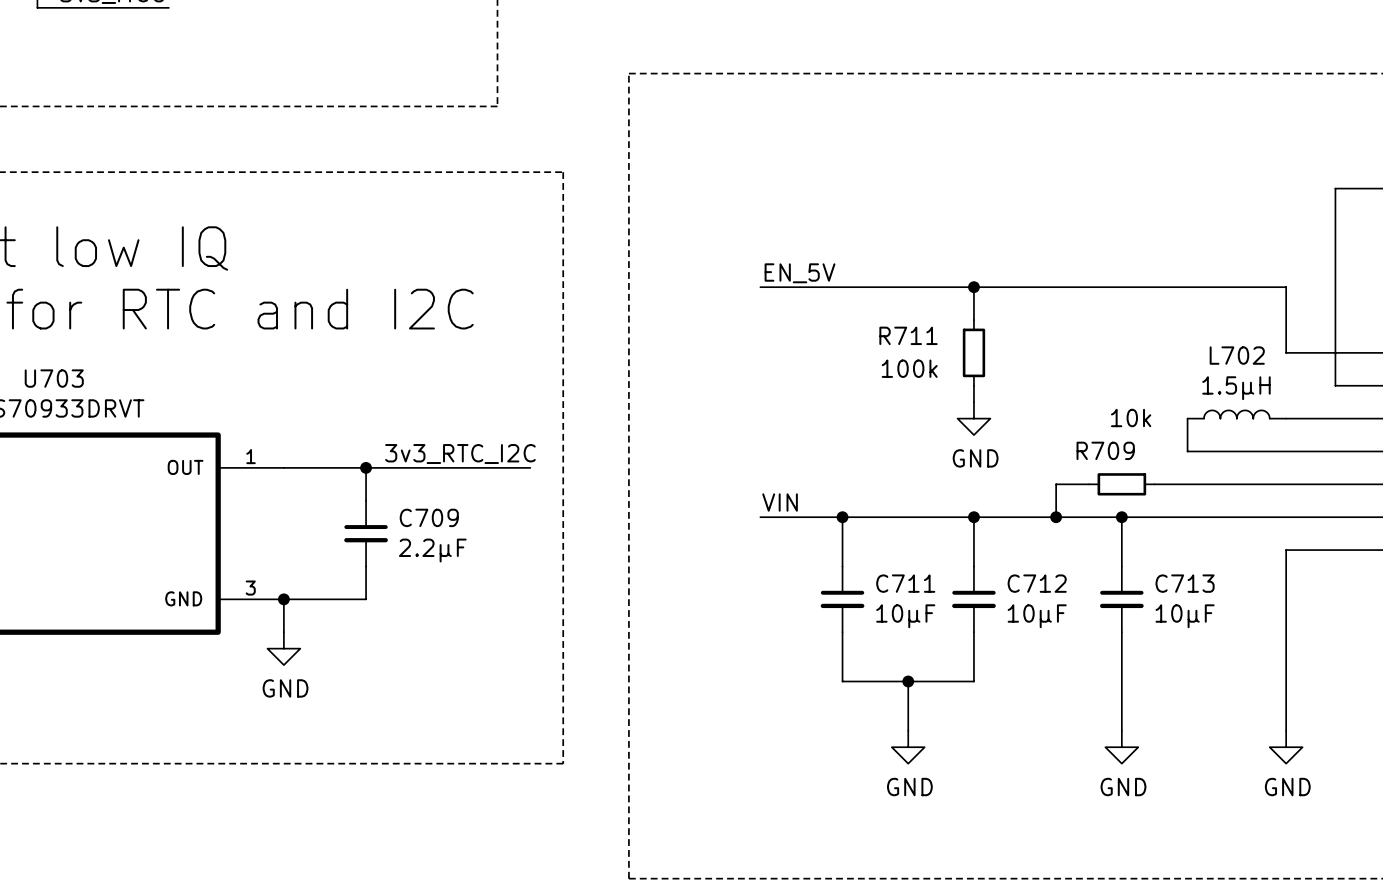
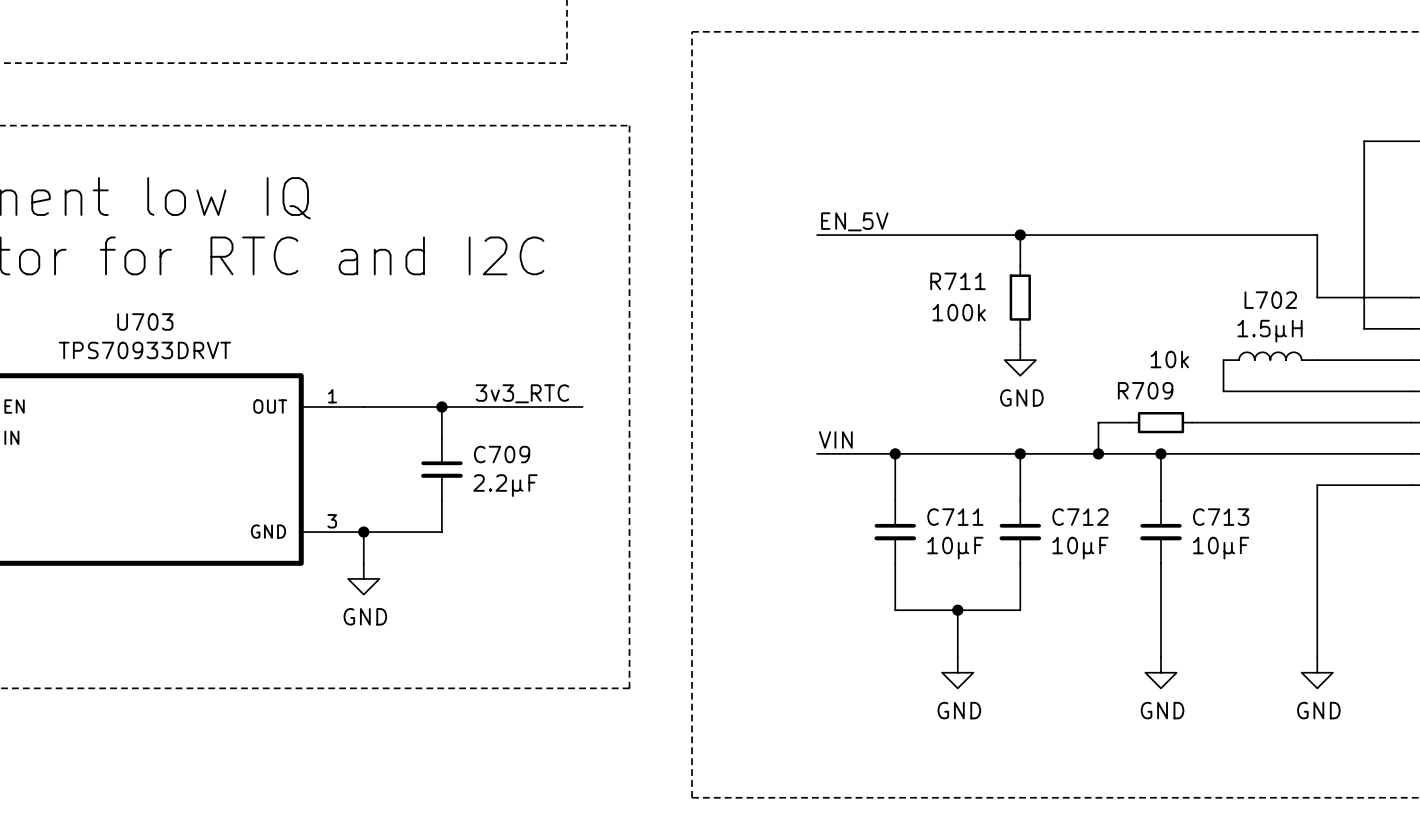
label: 3v3_RTC_I2C (460, 454) -> 3v3_RTC (522, 393)
wire: (513, 467) (530, 467) -> none

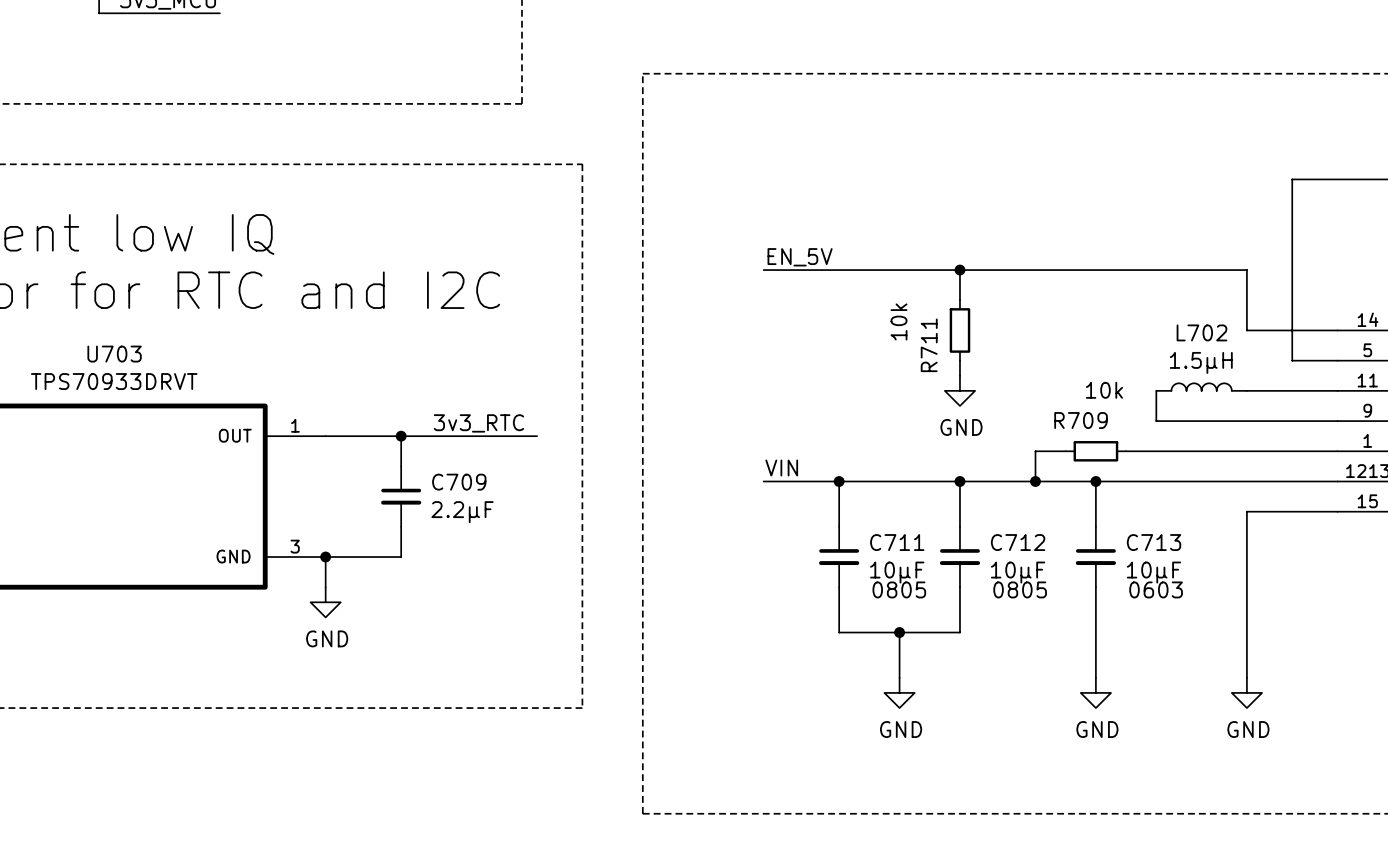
R711 name rotation: 0° (958, 281) -> 90° counterclockwise (929, 345)
R711 value: 100k (959, 312) -> 10k (899, 321)
text: none -> 0805 (899, 589)
text: none -> 0805 (1020, 589)
text: none -> 0603 (1156, 589)

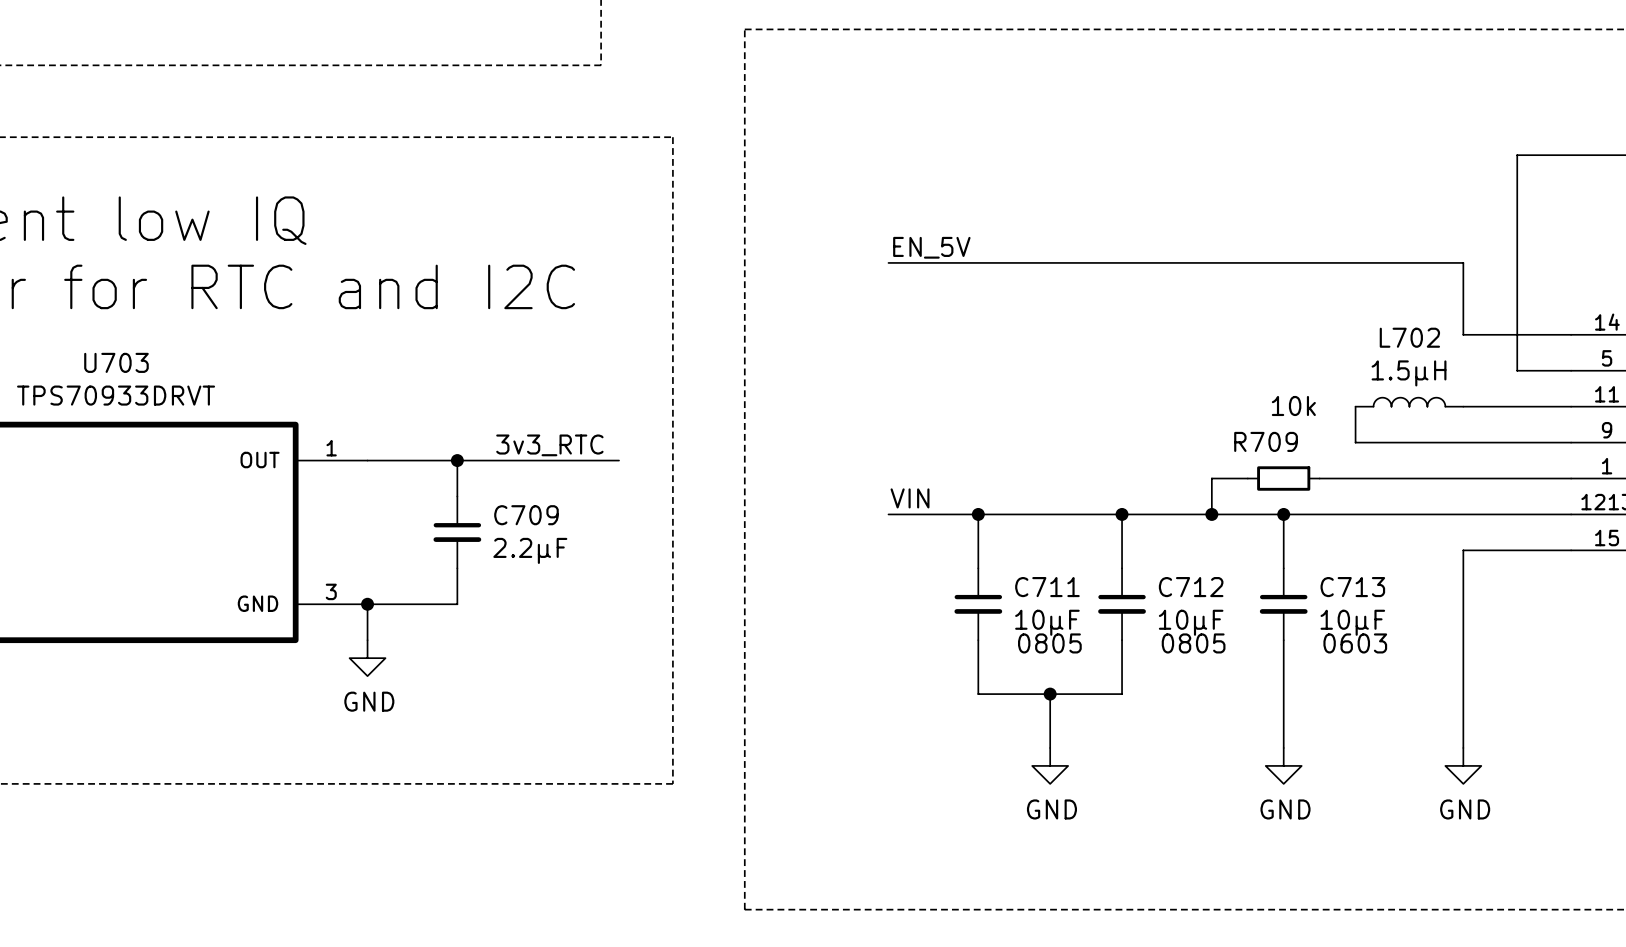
wire: (959, 270) (959, 300) -> none
junction: (959, 270) -> none
R711: 10k (959, 330) -> none
wire: (959, 360) (959, 375) -> none
power symbol: GND (959, 390) -> none

